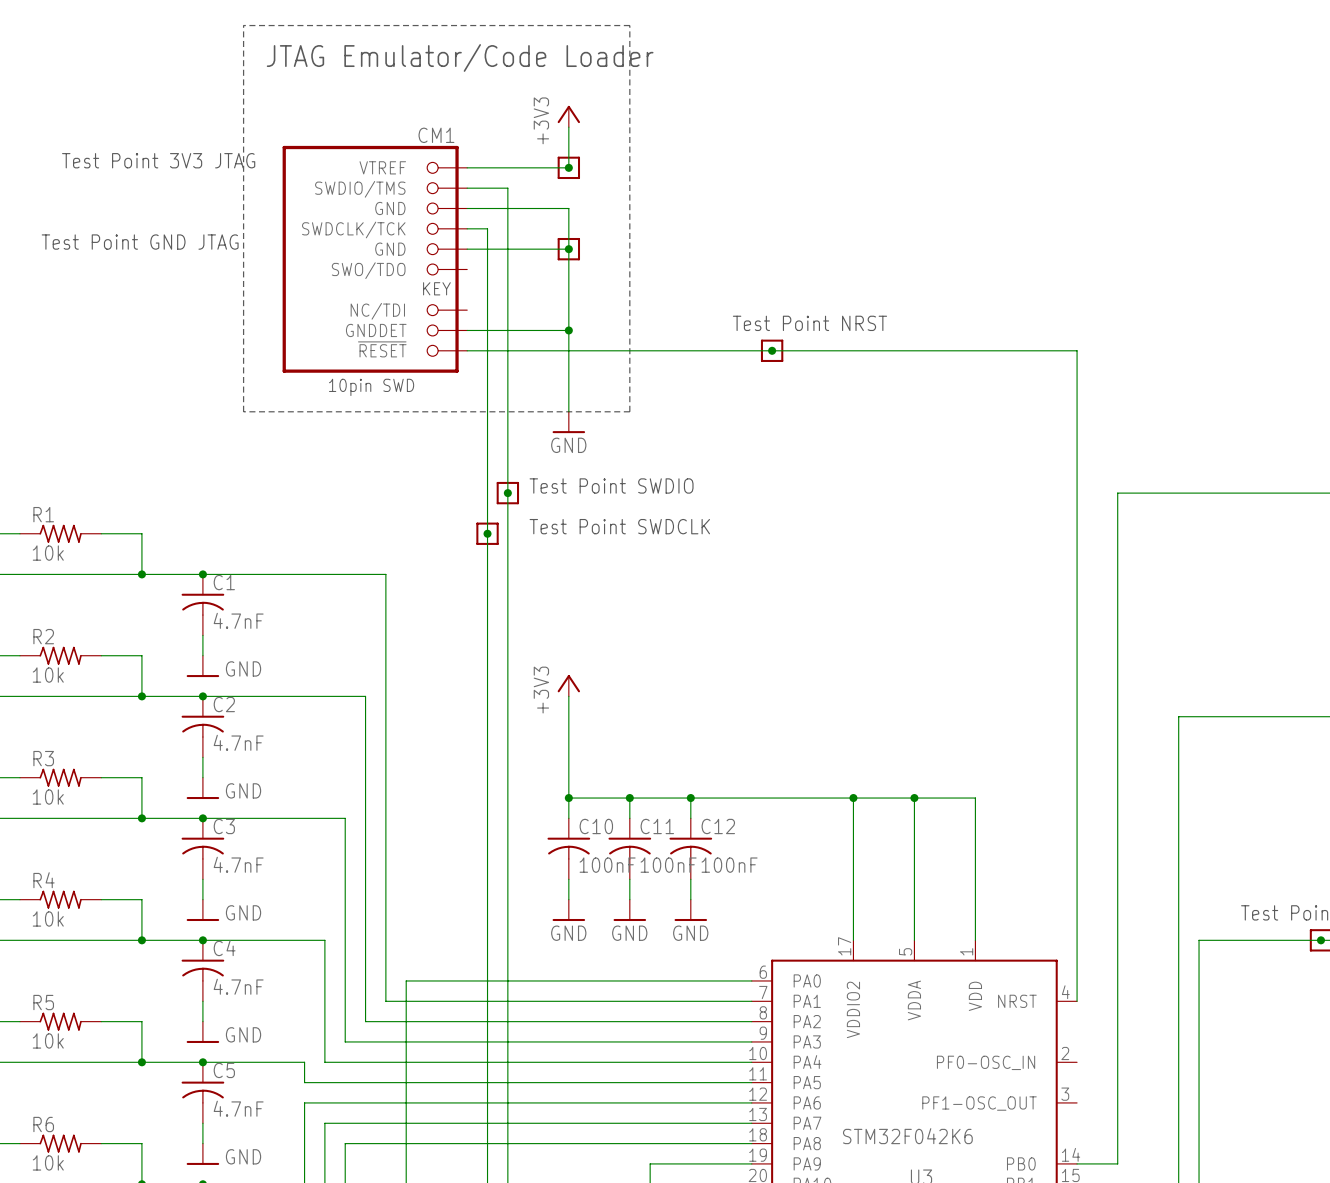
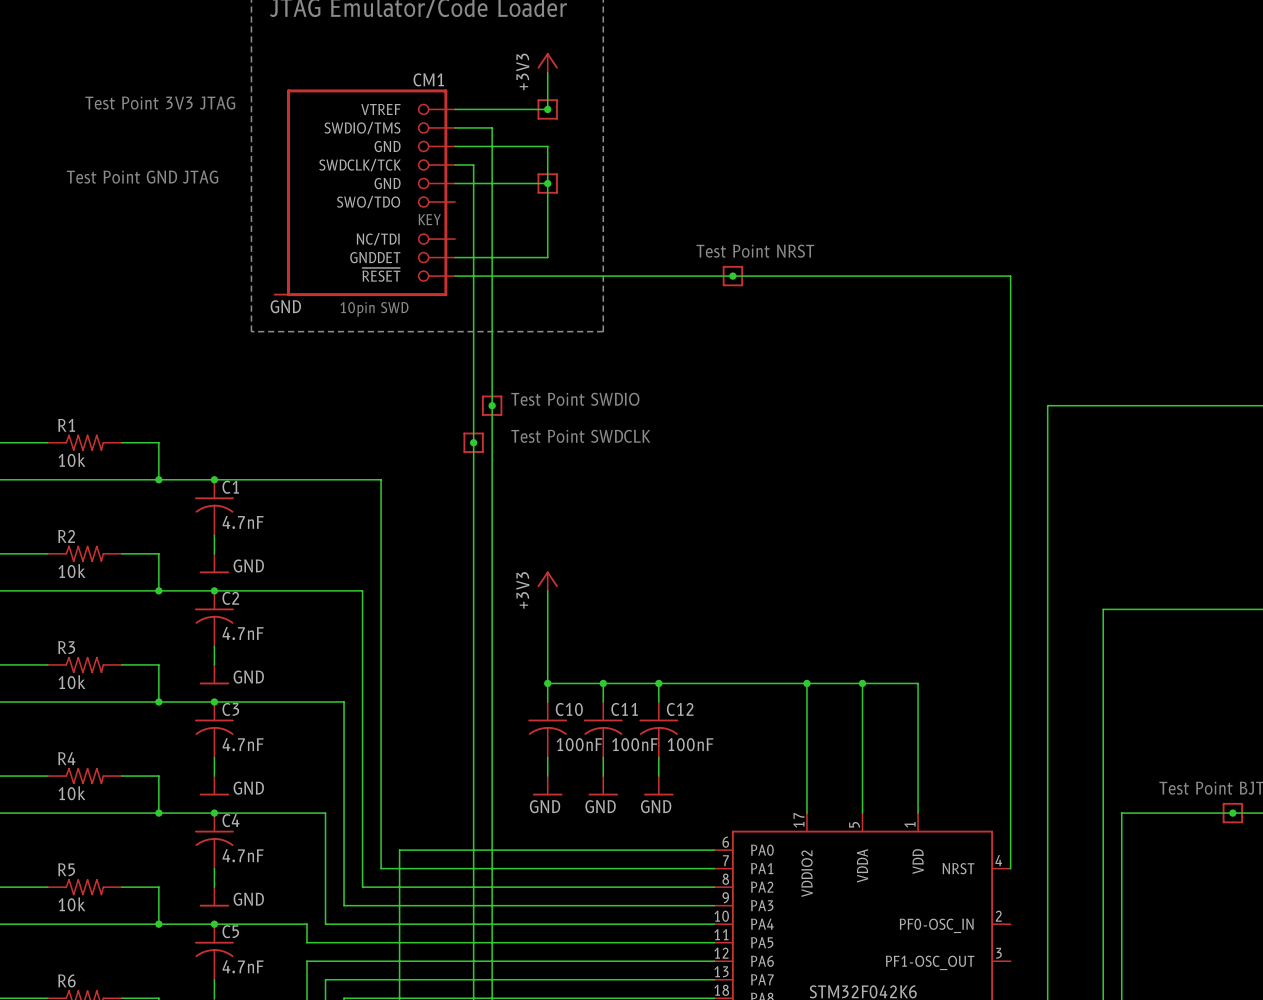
wire: (568, 330) (568, 411) -> none
junction: (568, 330) -> none
power symbol: none -> GND (288, 285)
power symbol: GND (568, 422) -> none

